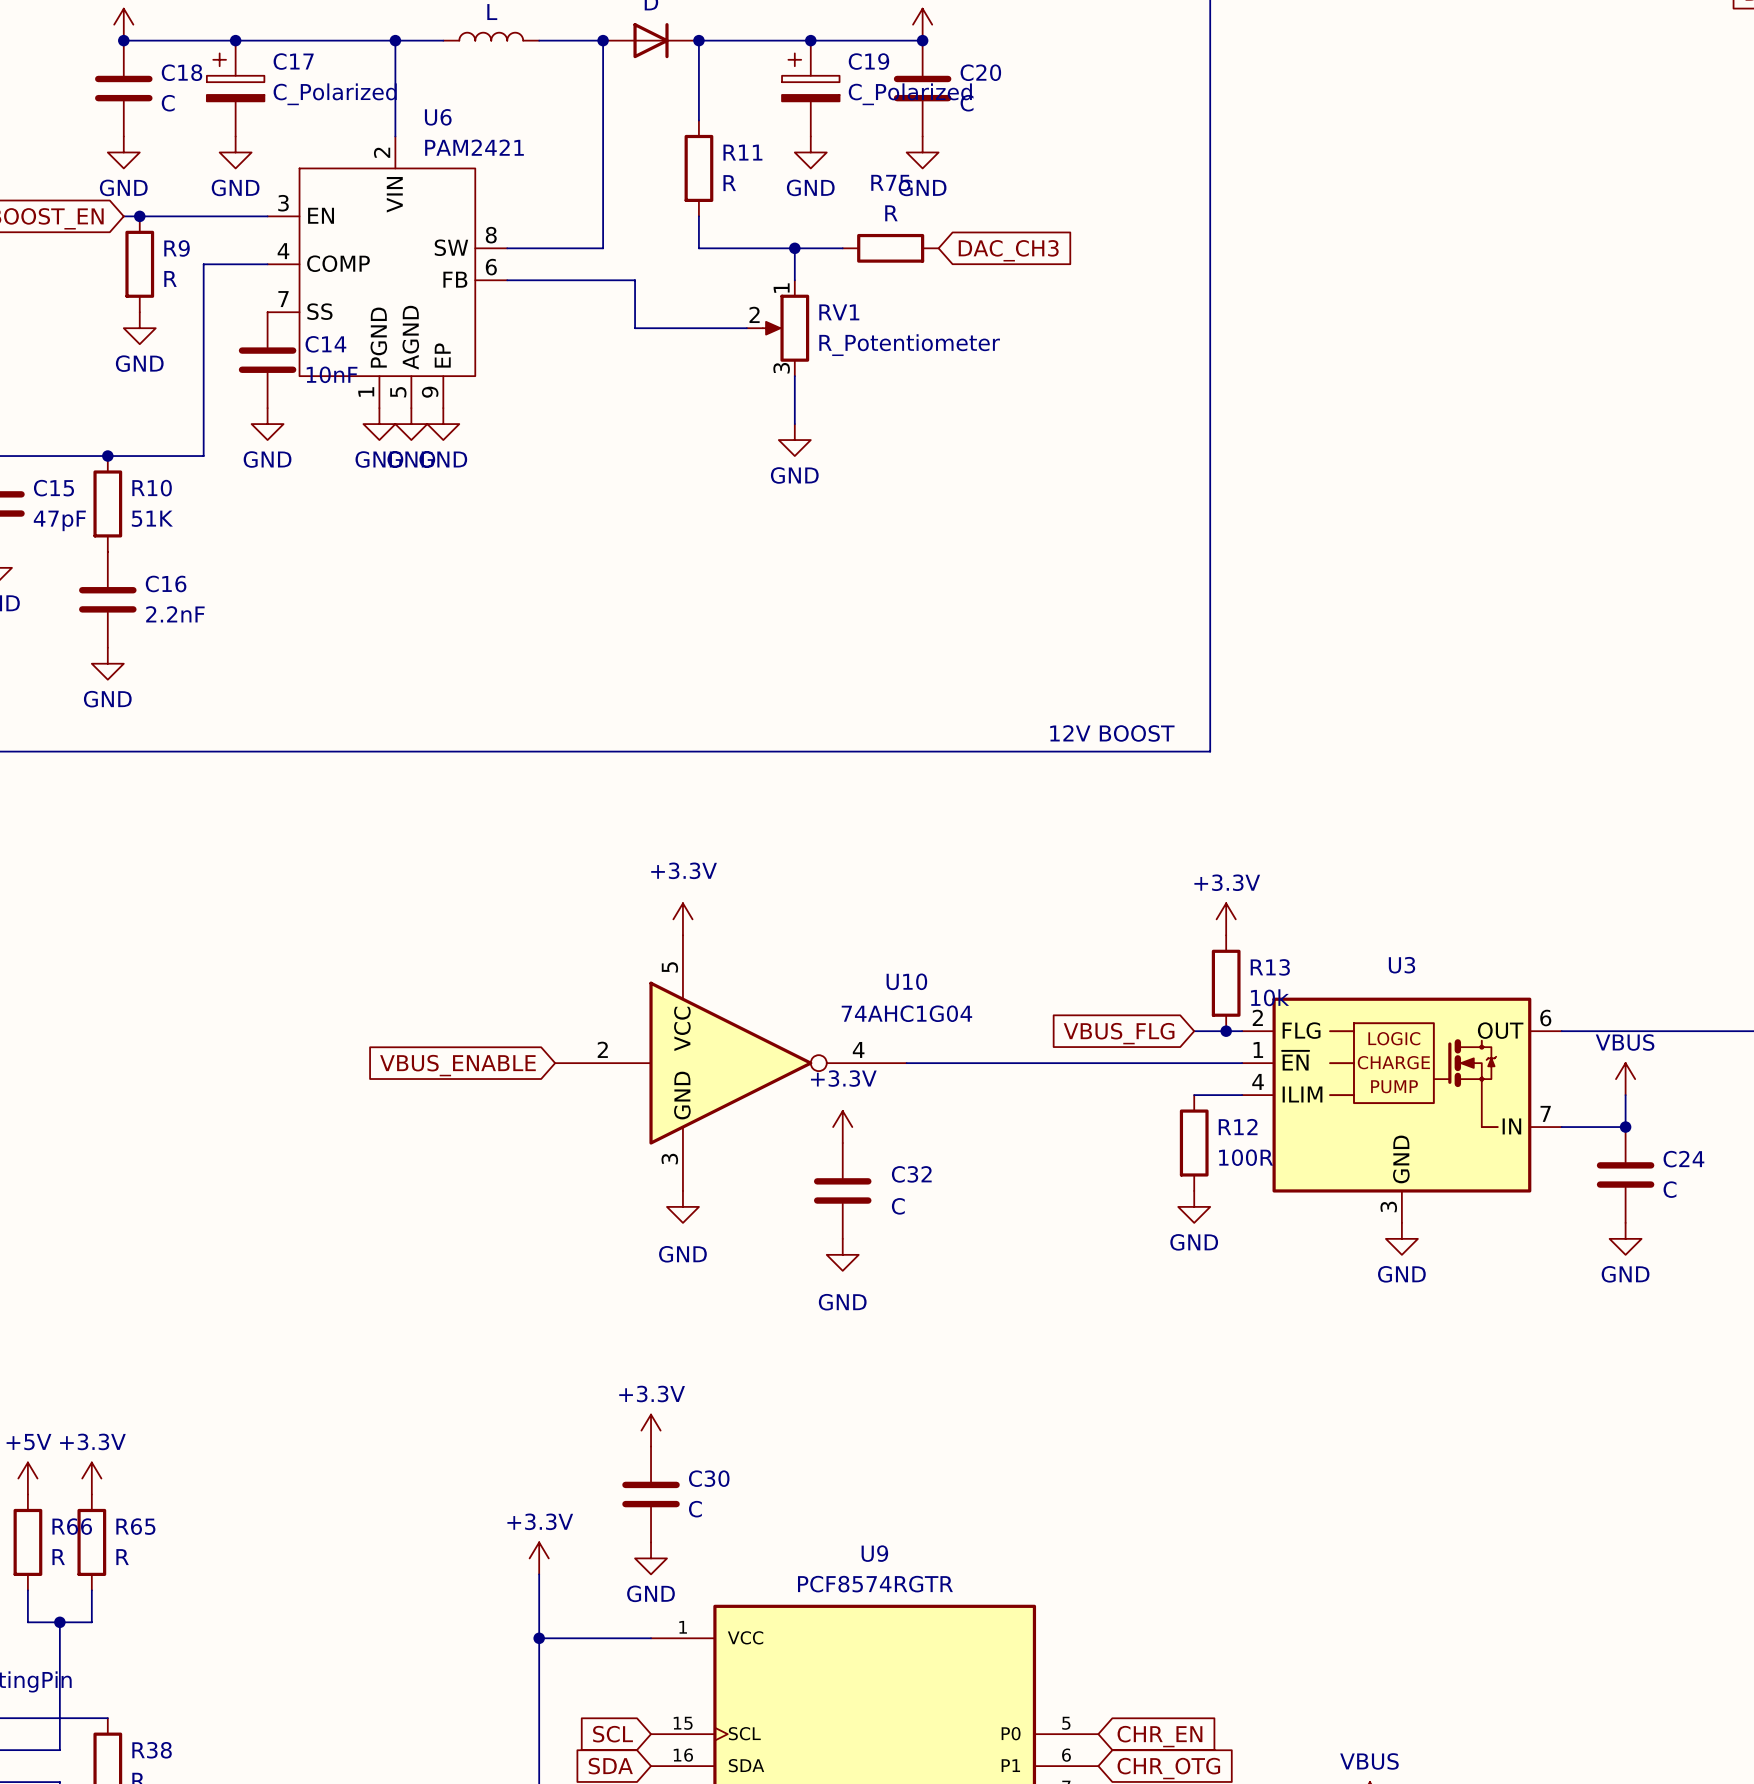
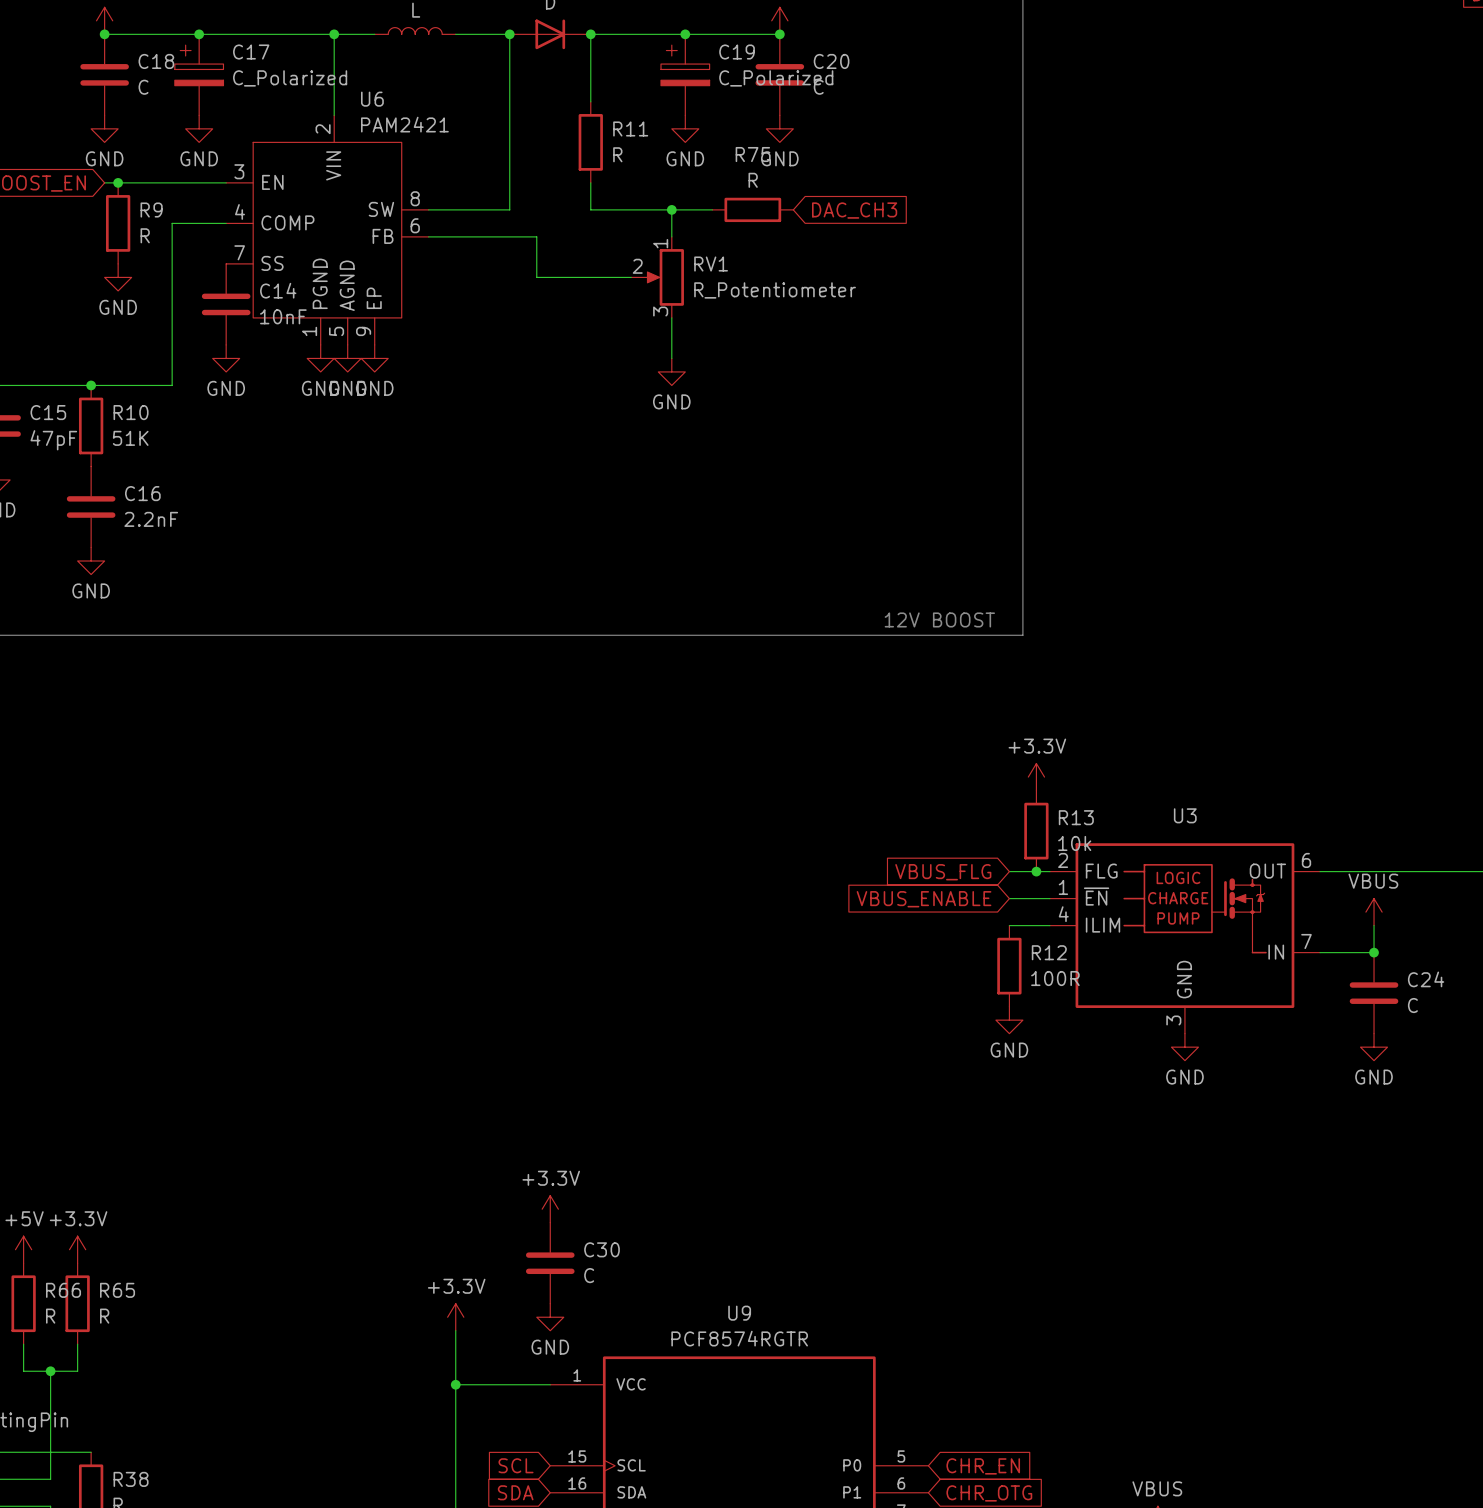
power symbol: +3.3V (682, 919) -> none
U10: 74AHC1G04 (730, 1063) -> none
wire: (906, 1063) (1194, 1063) -> none
global label: VBUS_ENABLE (457, 1065) -> none
global label: none -> VBUS_ENABLE (924, 899)
power symbol: +3.3V (842, 1127) -> none
C32: C (842, 1190) -> none
power symbol: GND (682, 1206) -> none
power symbol: GND (842, 1254) -> none

